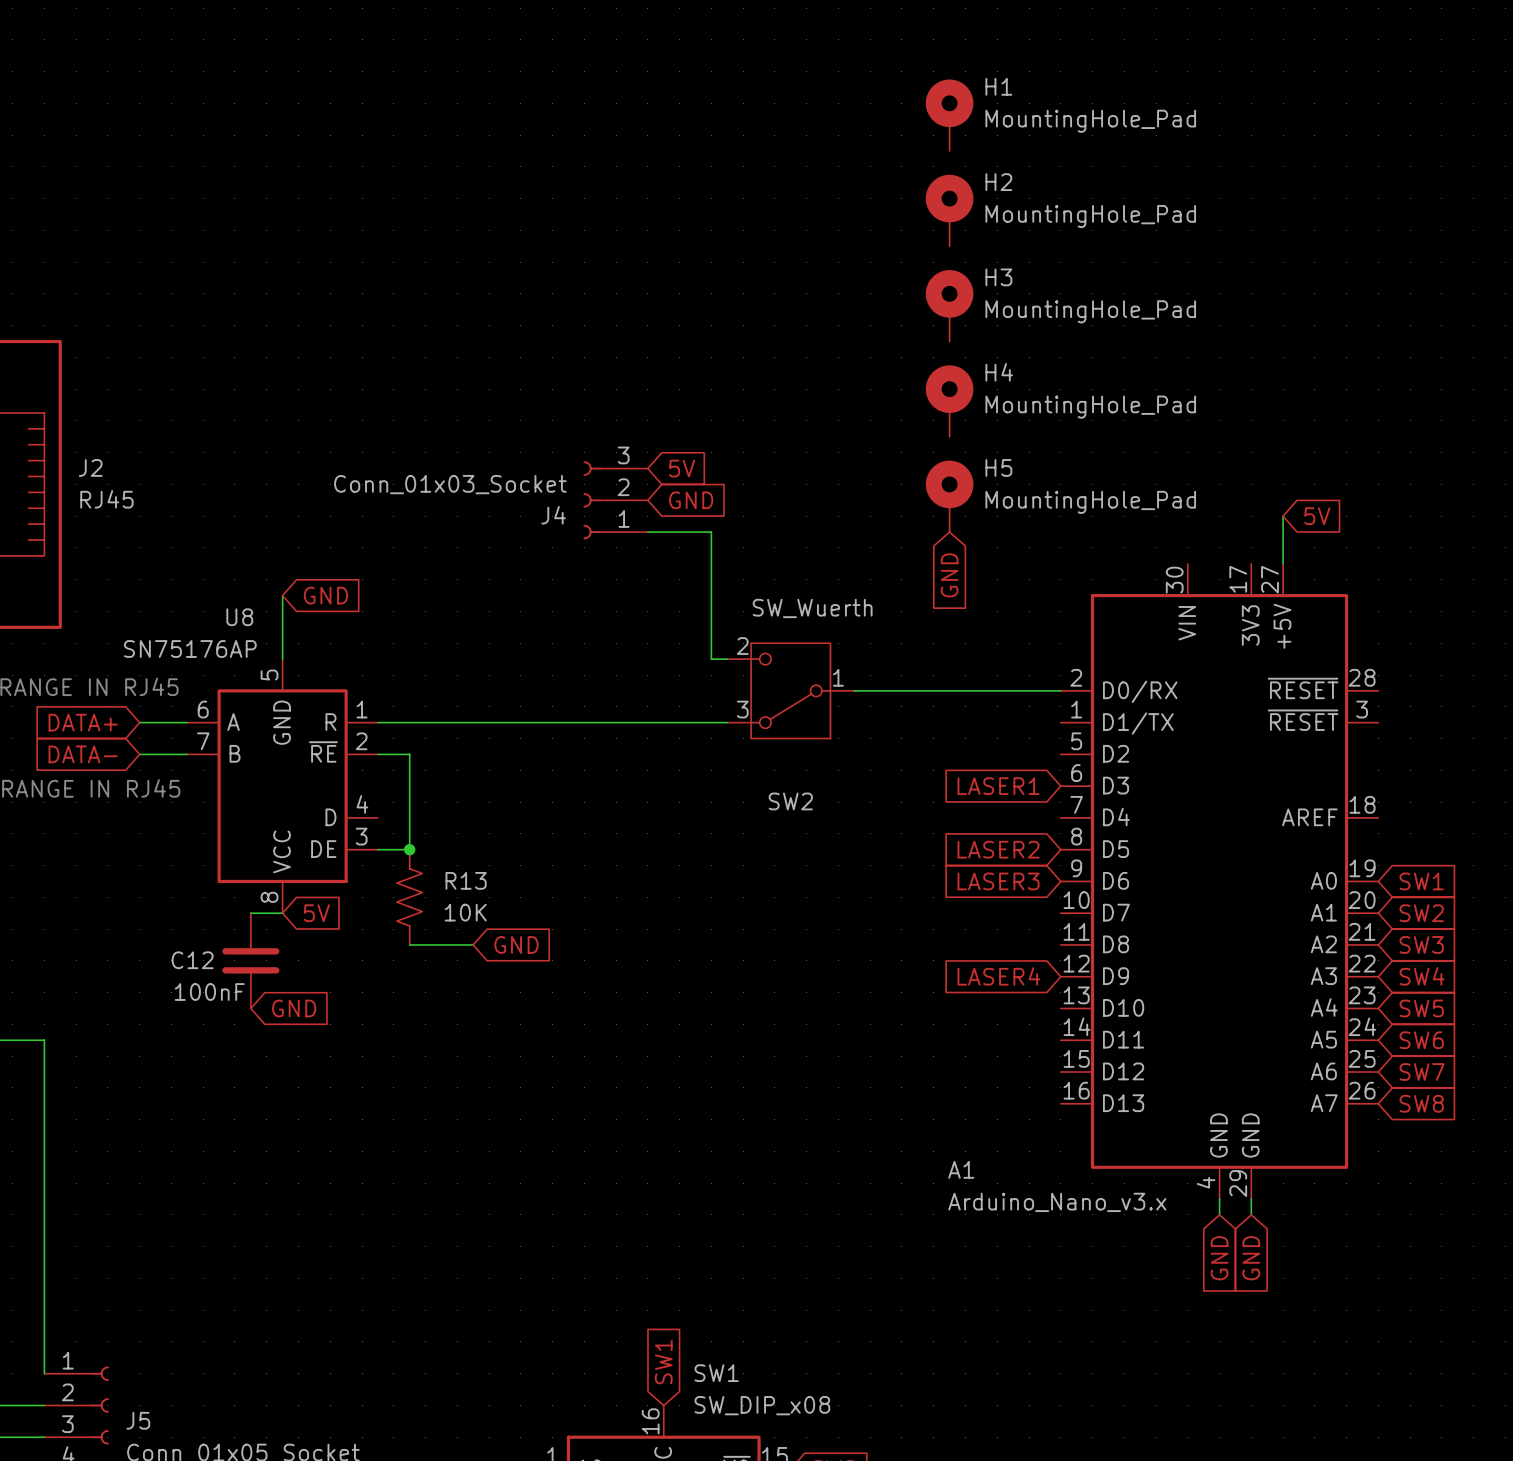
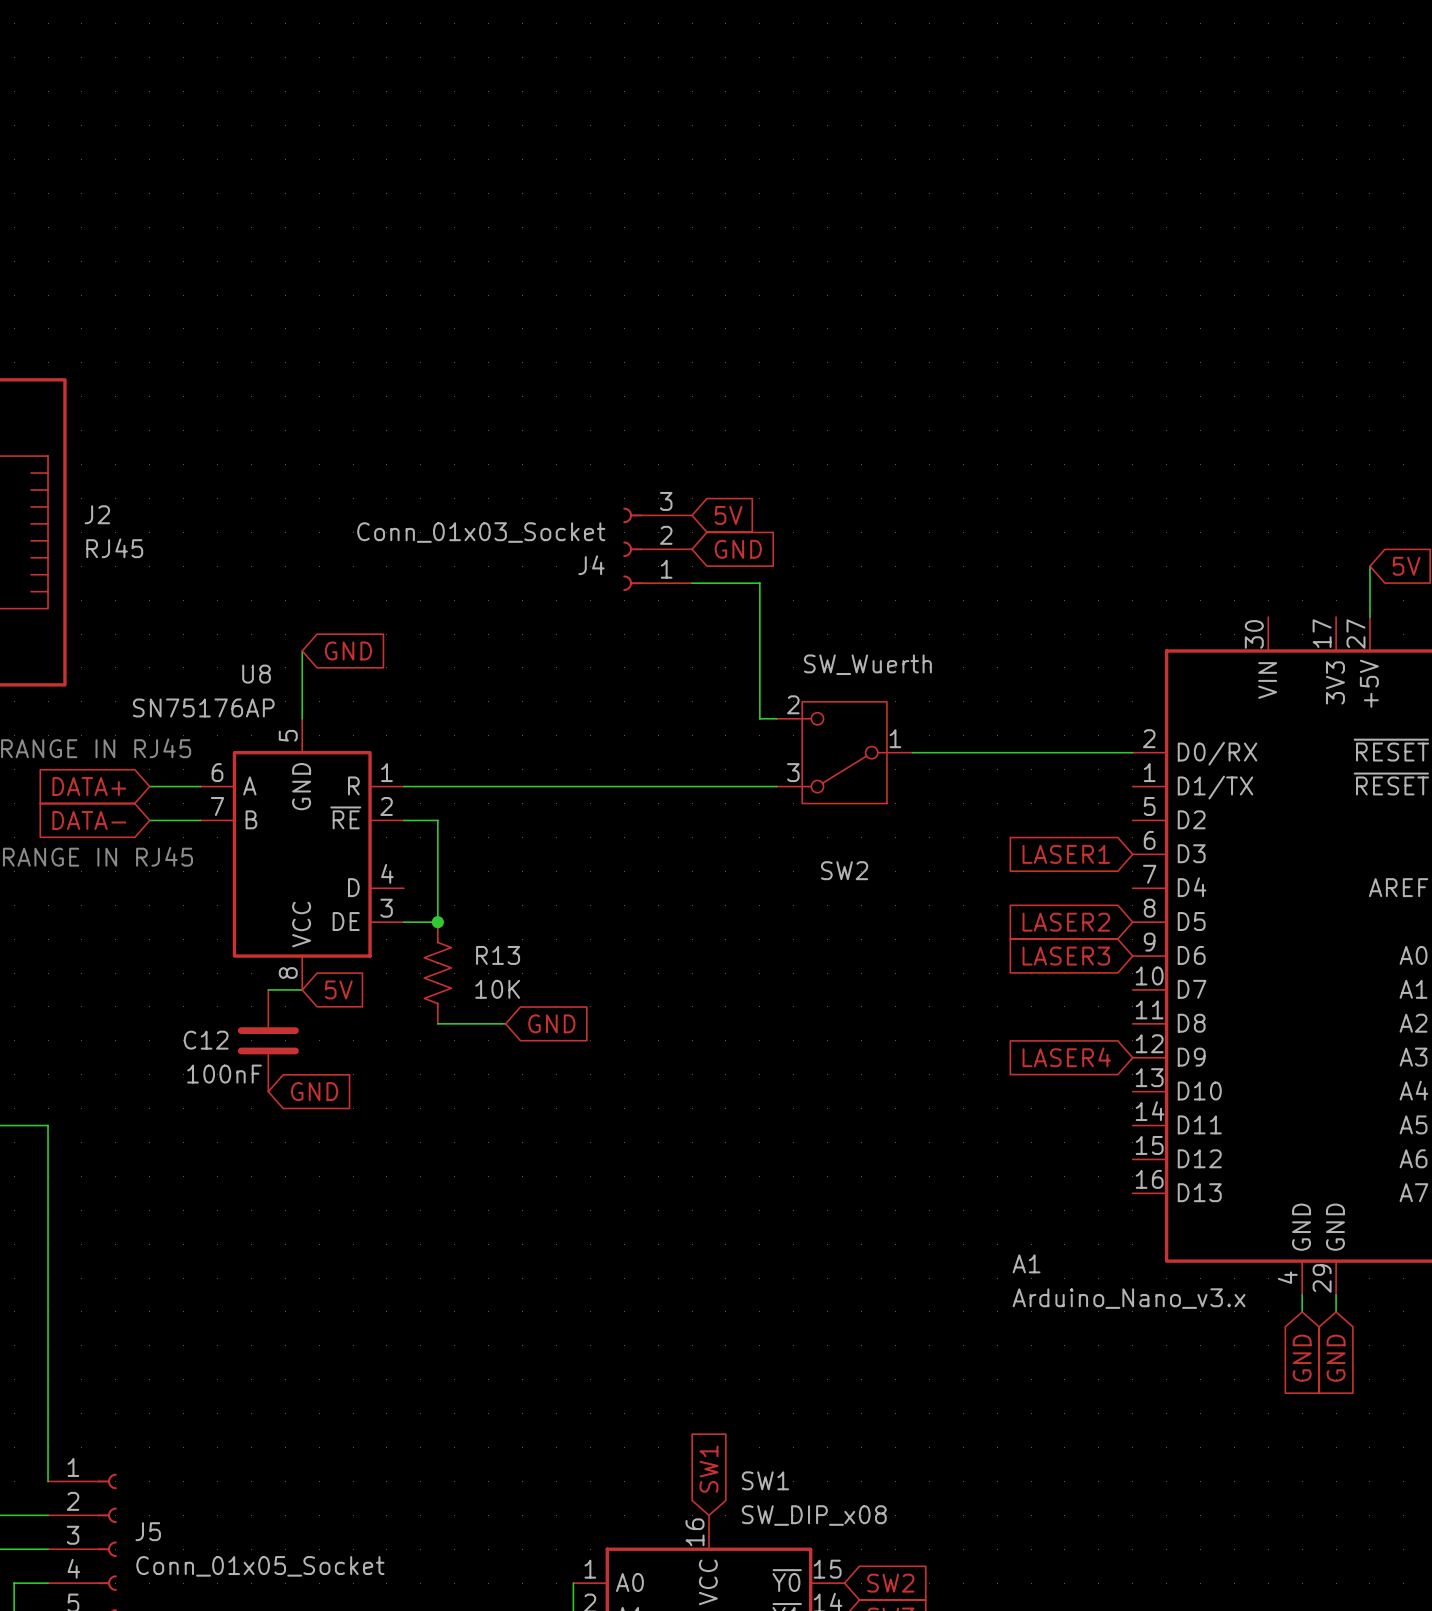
H1: MountingHole_Pad (949, 115) -> none
H2: MountingHole_Pad (949, 210) -> none
H3: MountingHole_Pad (949, 305) -> none
H4: MountingHole_Pad (949, 401) -> none
H5: MountingHole_Pad (949, 496) -> none
global label: GND (949, 575) -> none

